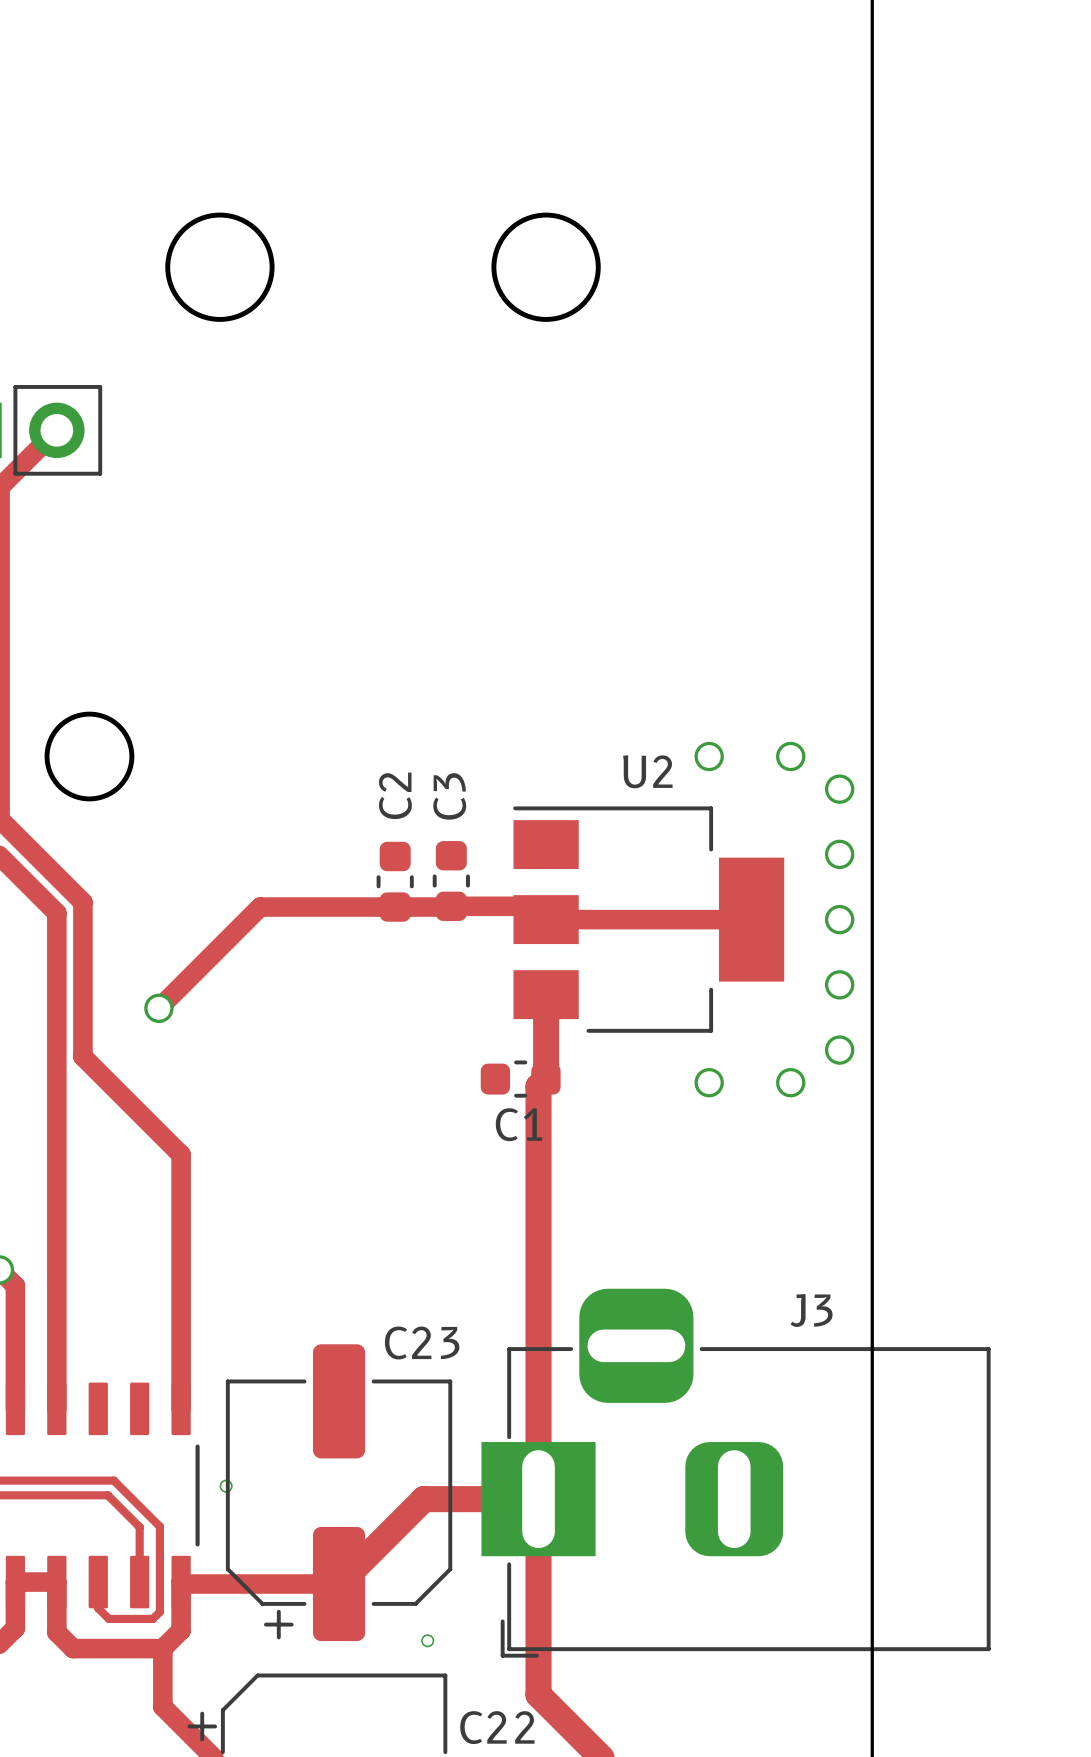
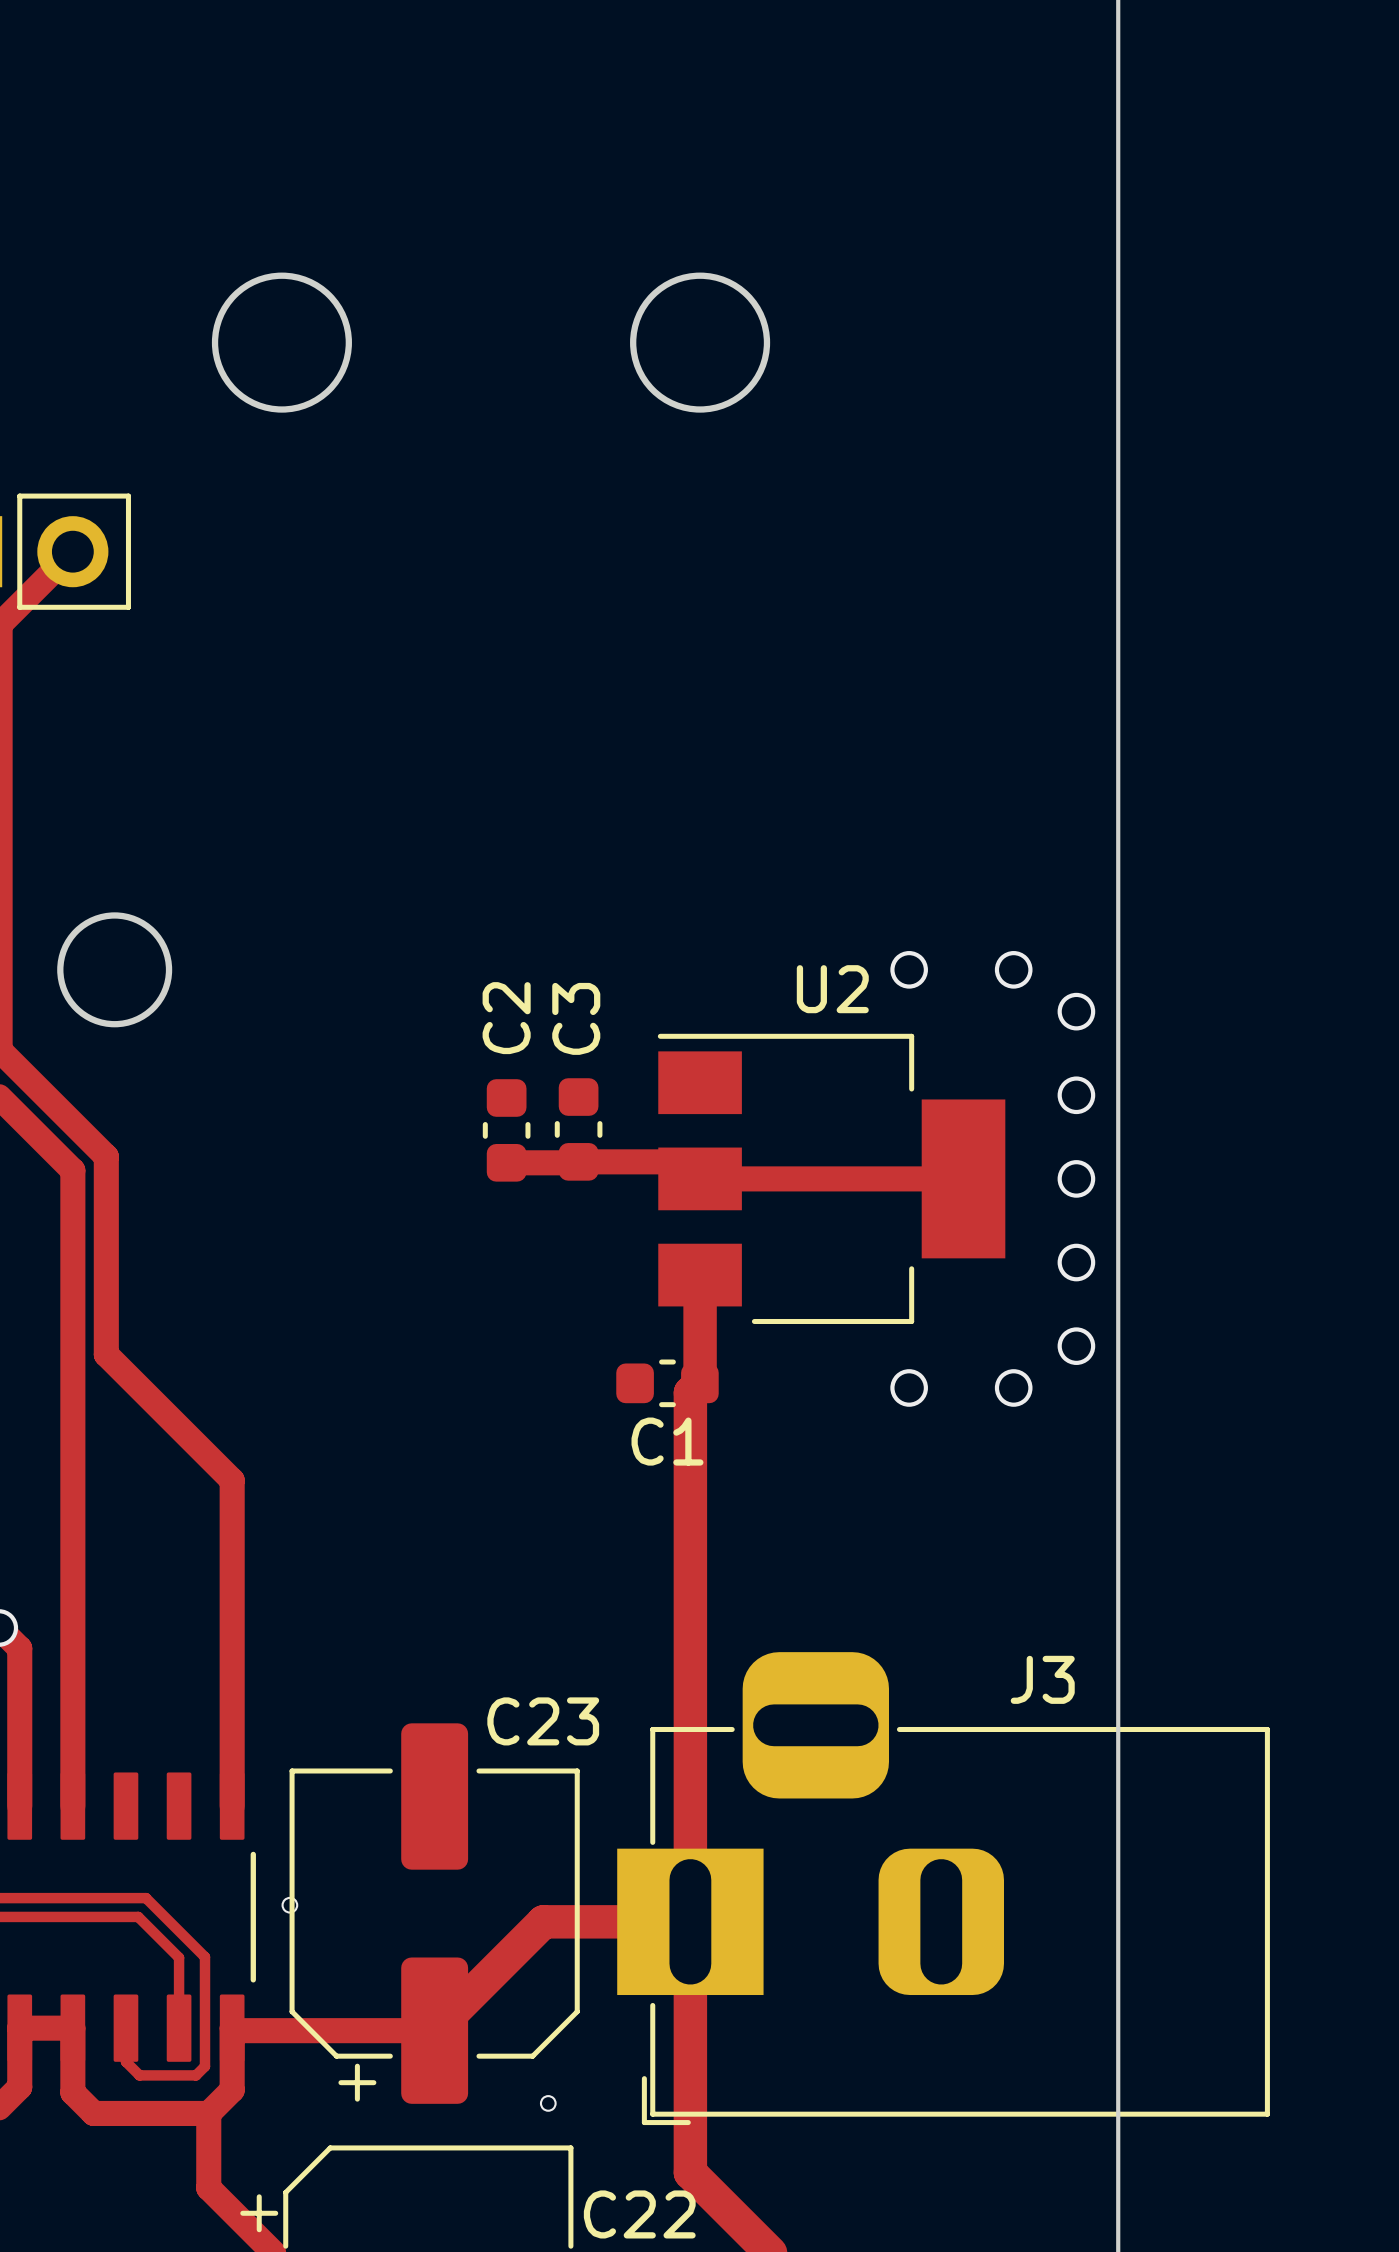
track: (395, 907) (260, 907) (158, 1008) -> none
via: (158, 1008) -> none

